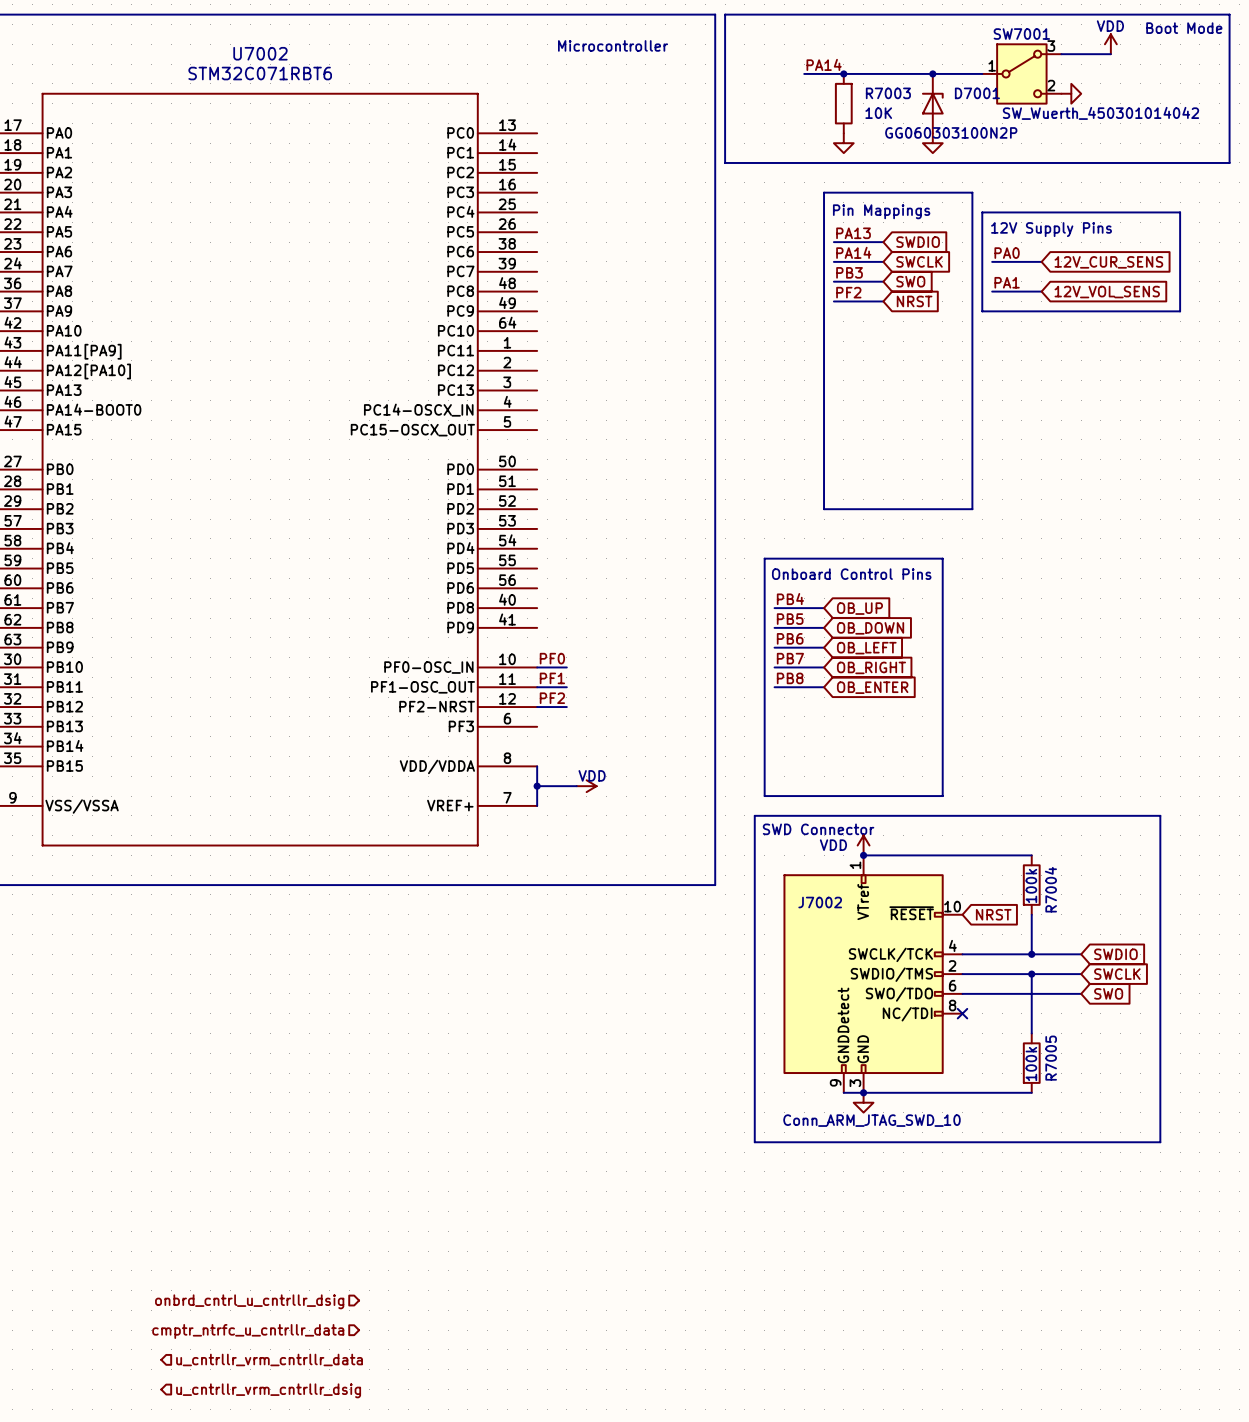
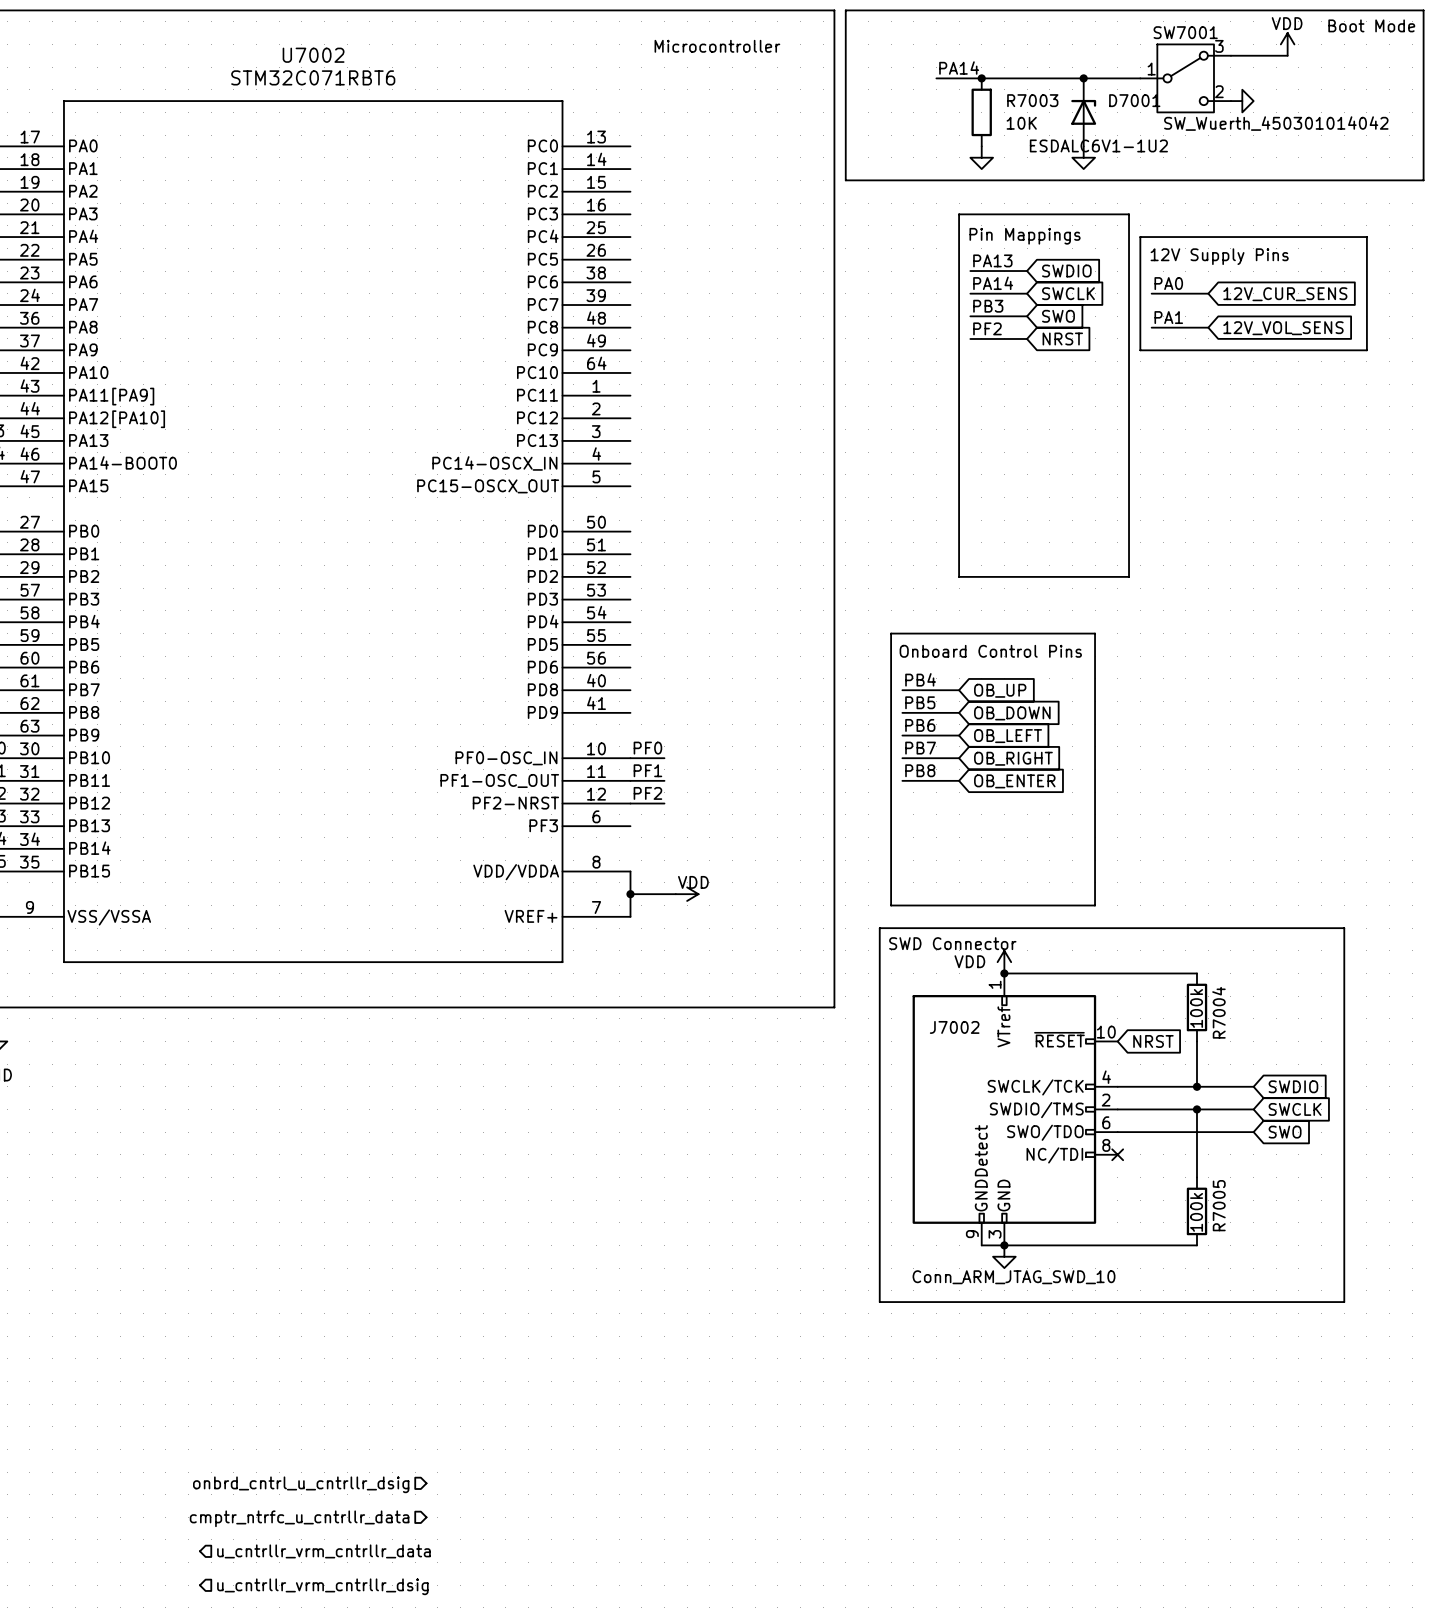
D7001 value: GG060303100N2P (951, 132) -> ESDALC6V1-1U2 (1098, 145)

